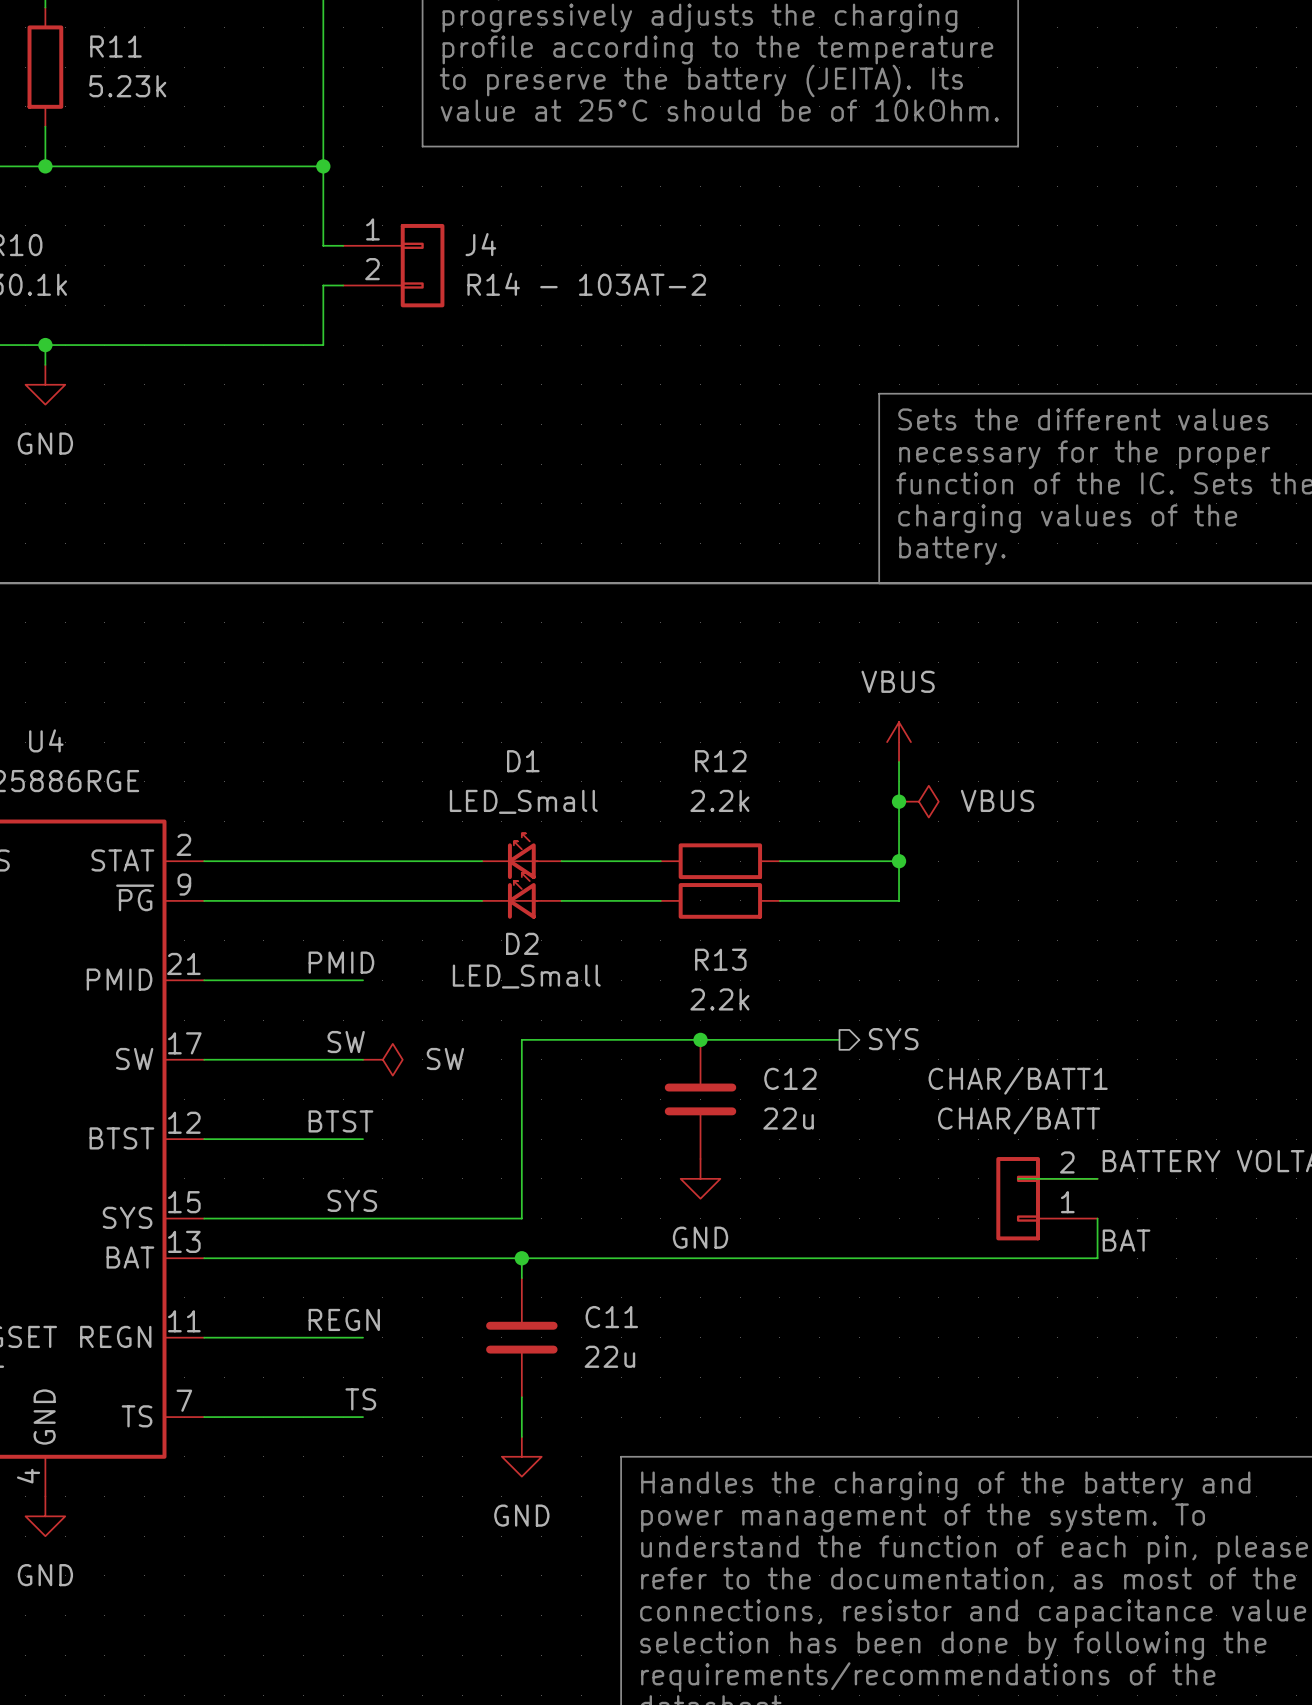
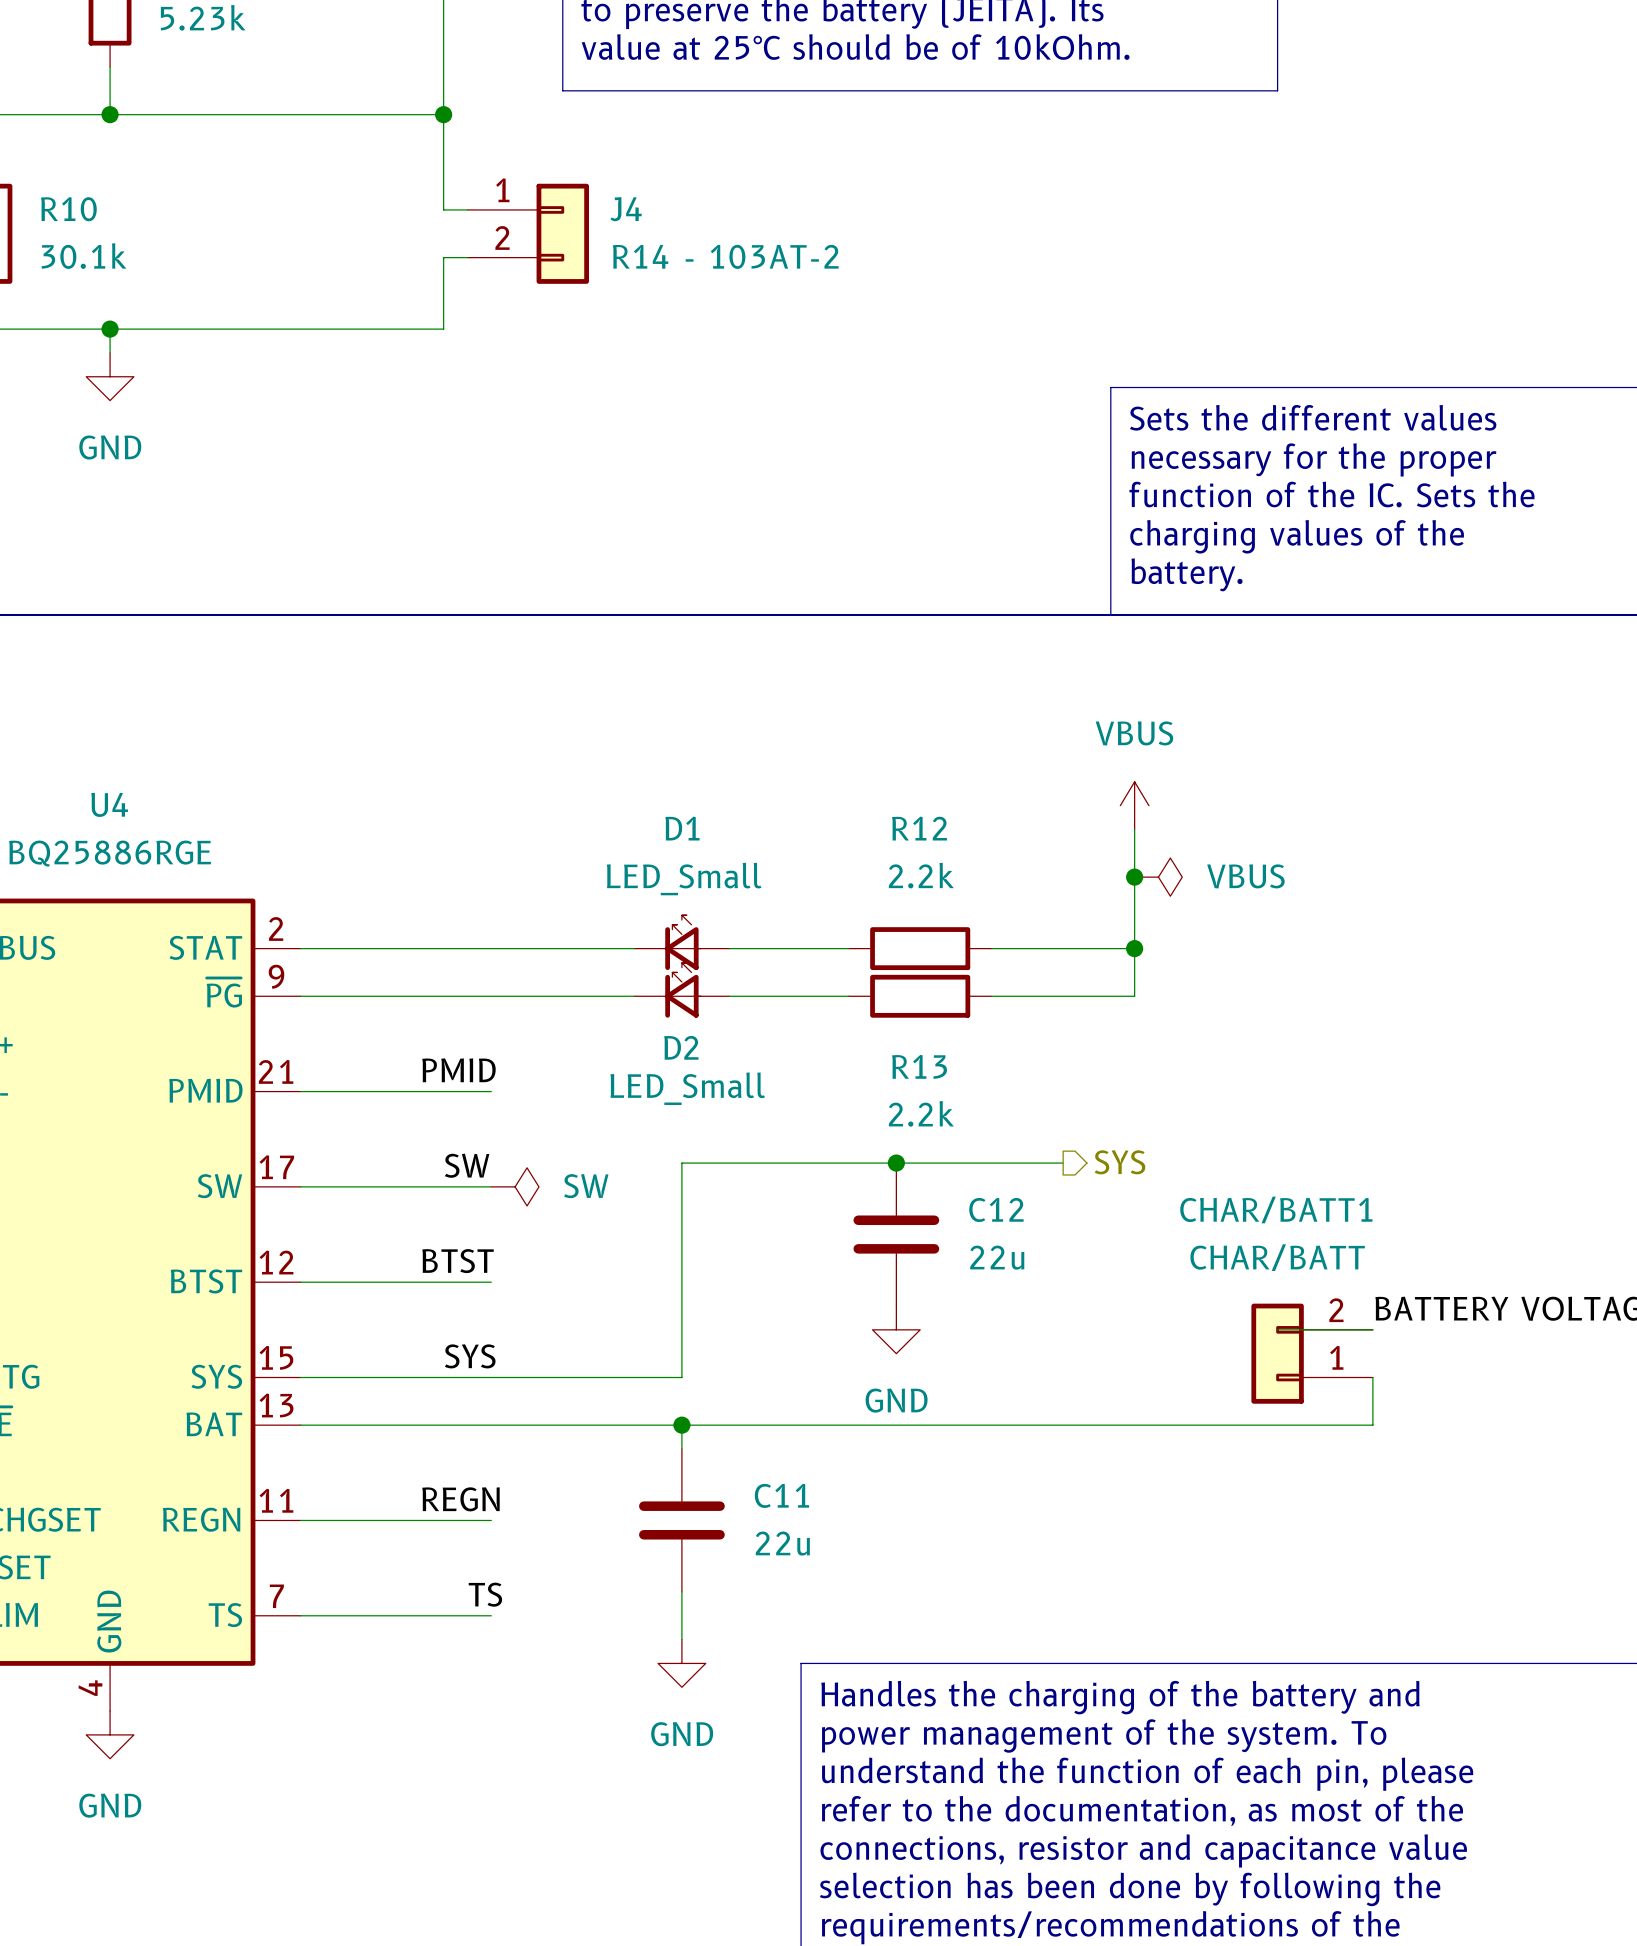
label: BAT (1126, 1240) -> none

